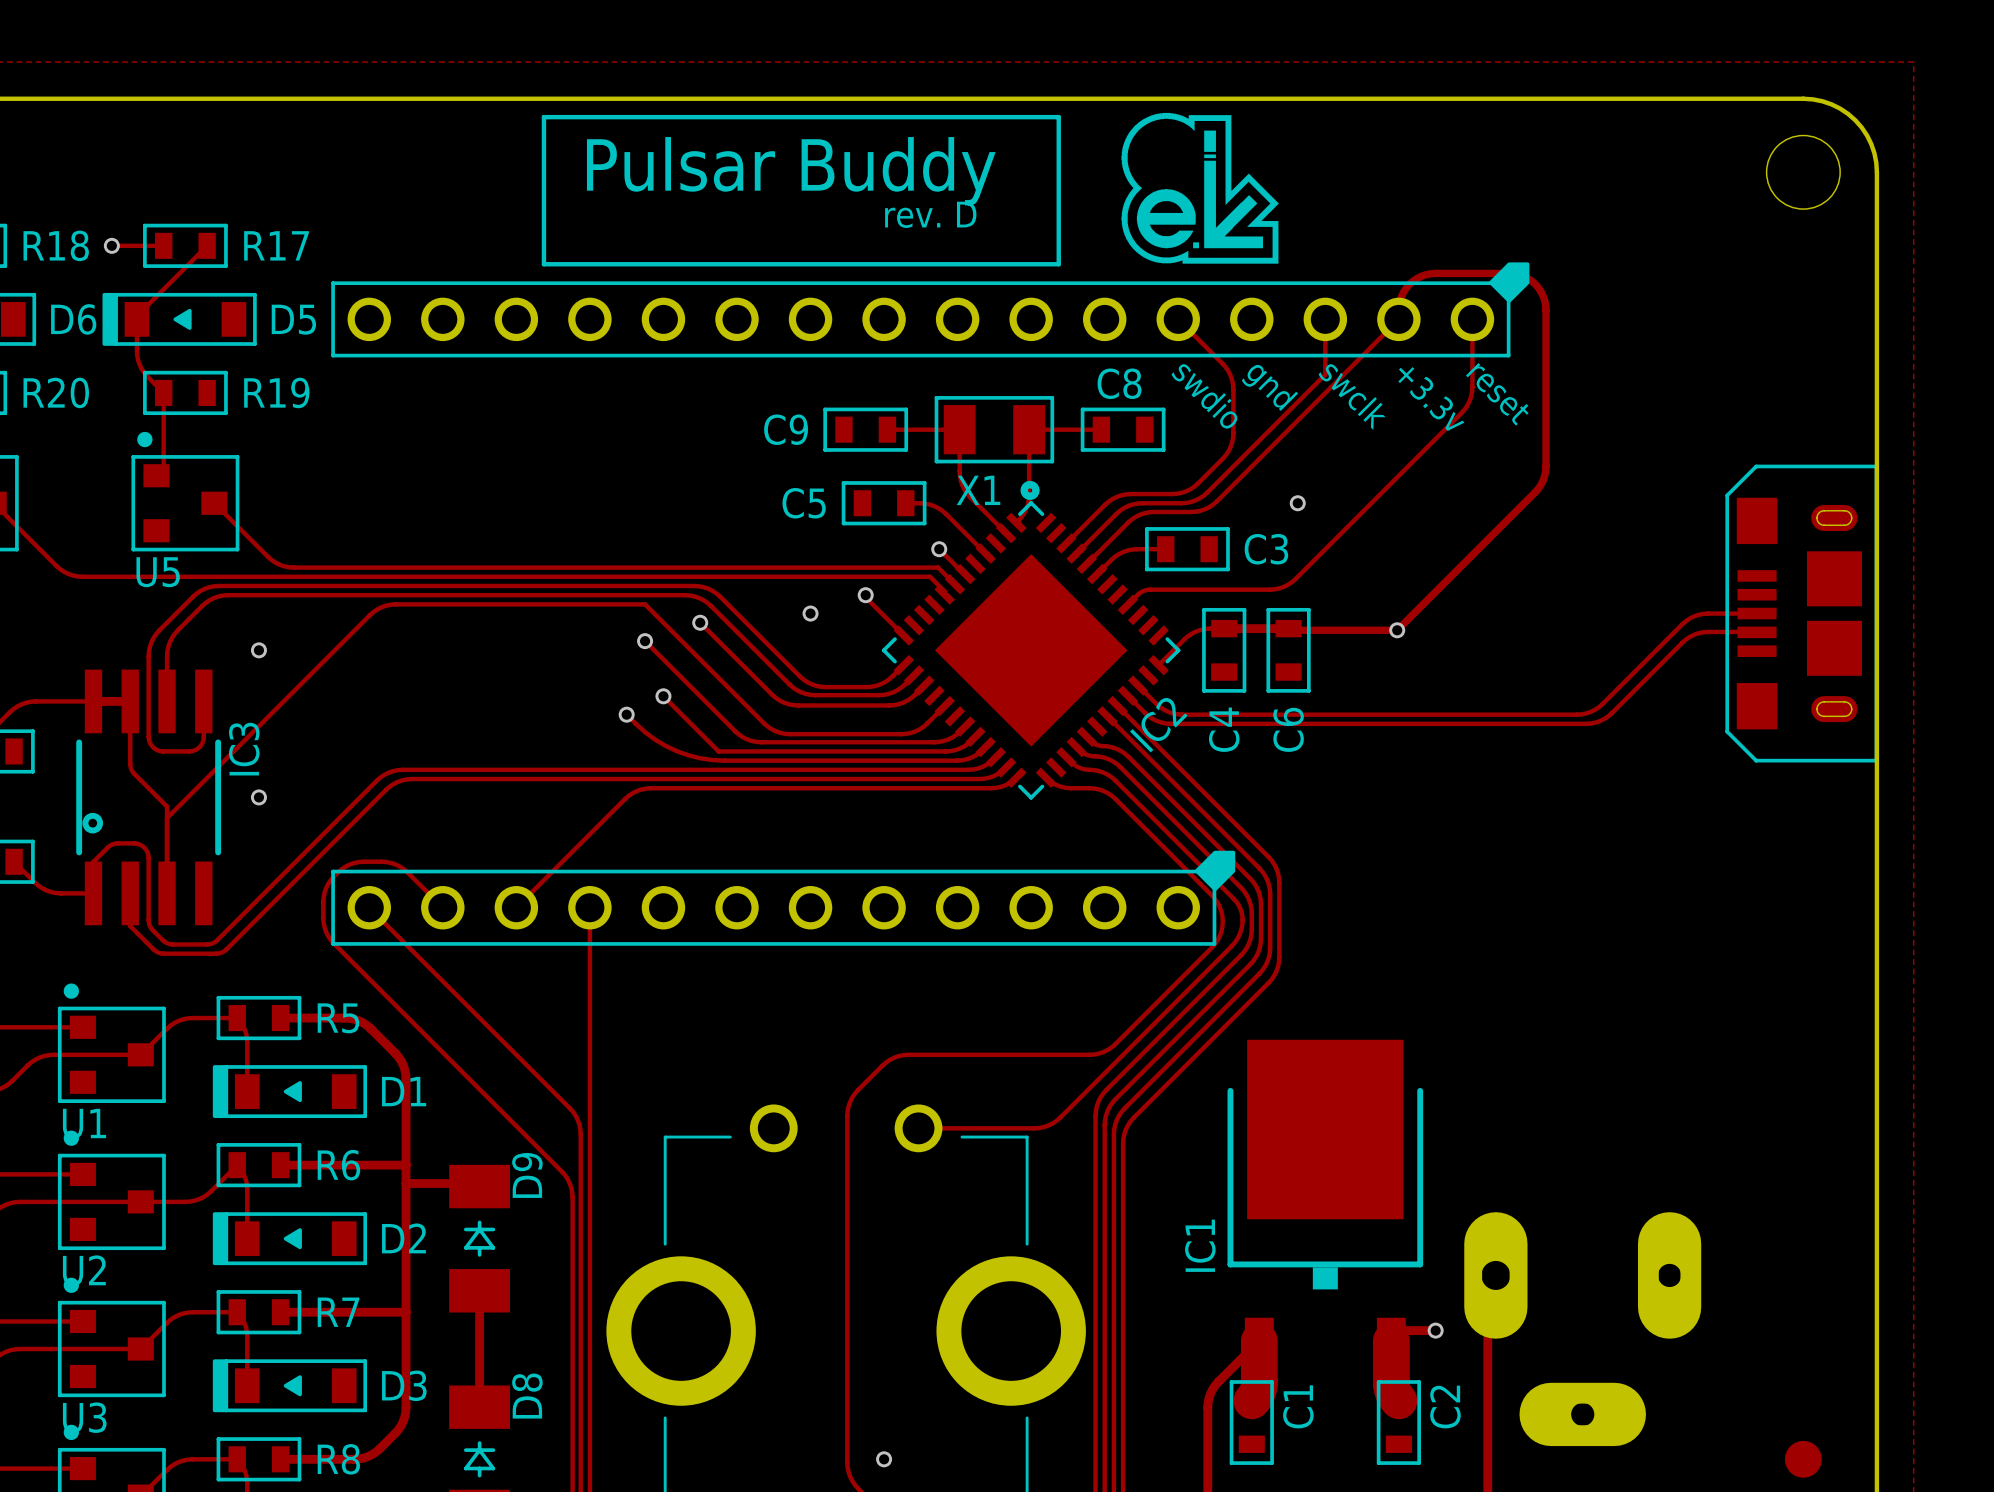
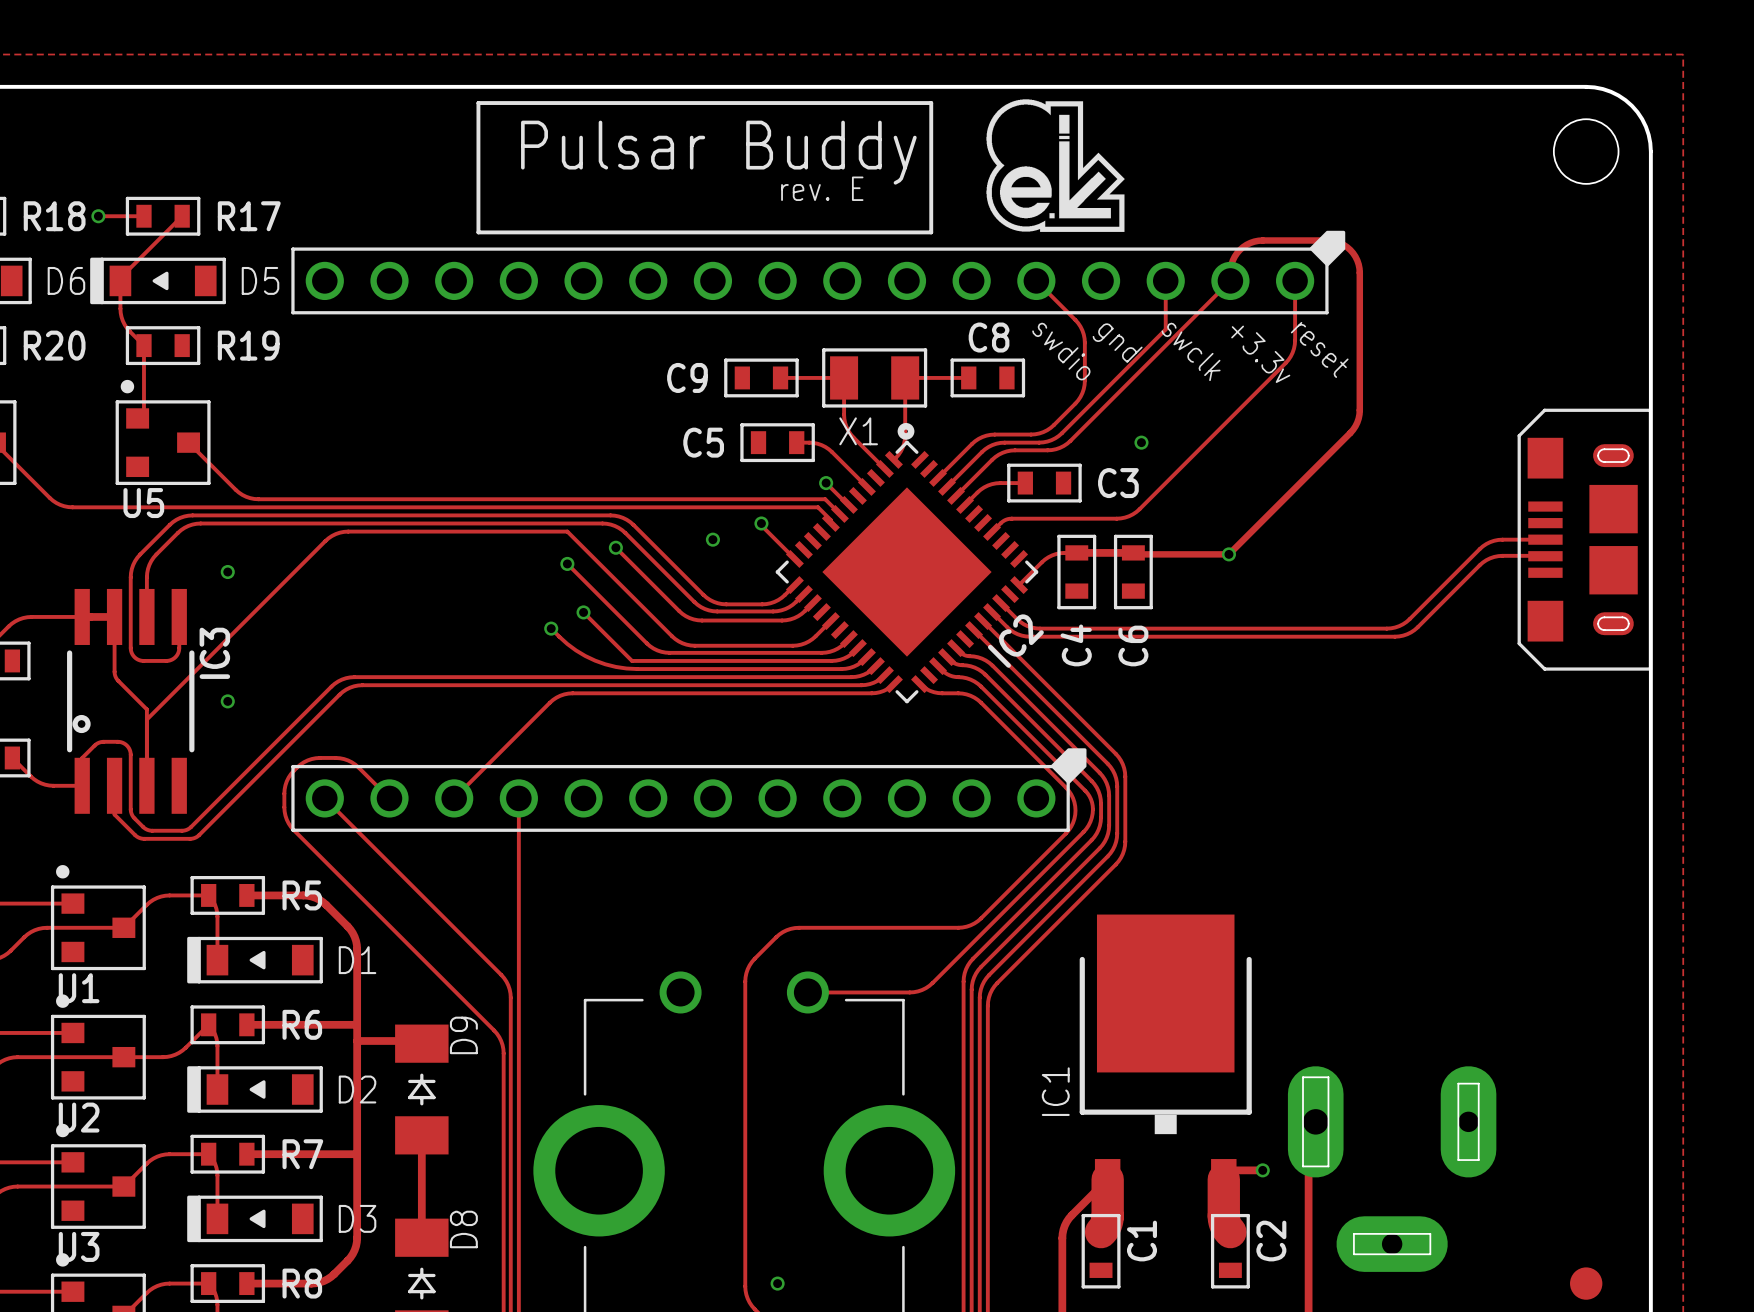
text: rev. D (930, 214) -> rev. E (822, 188)

